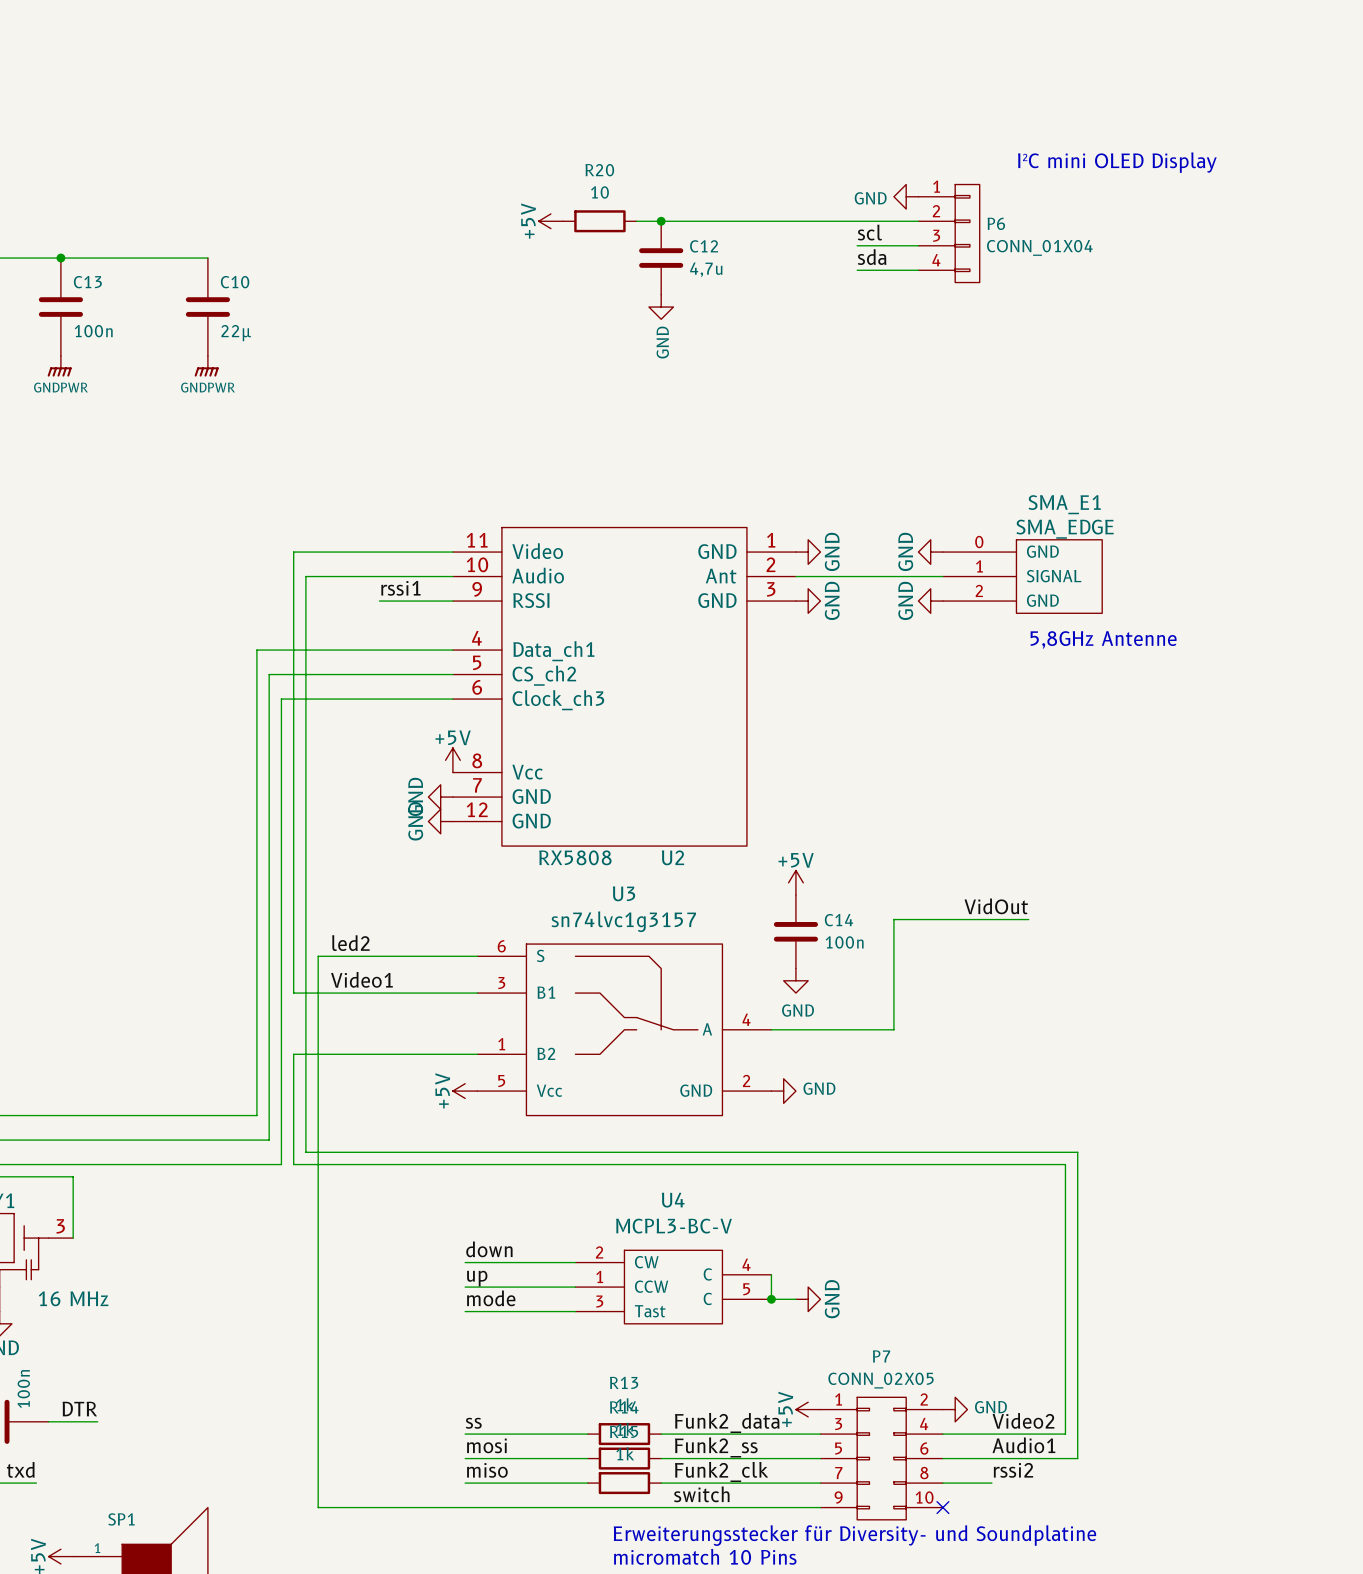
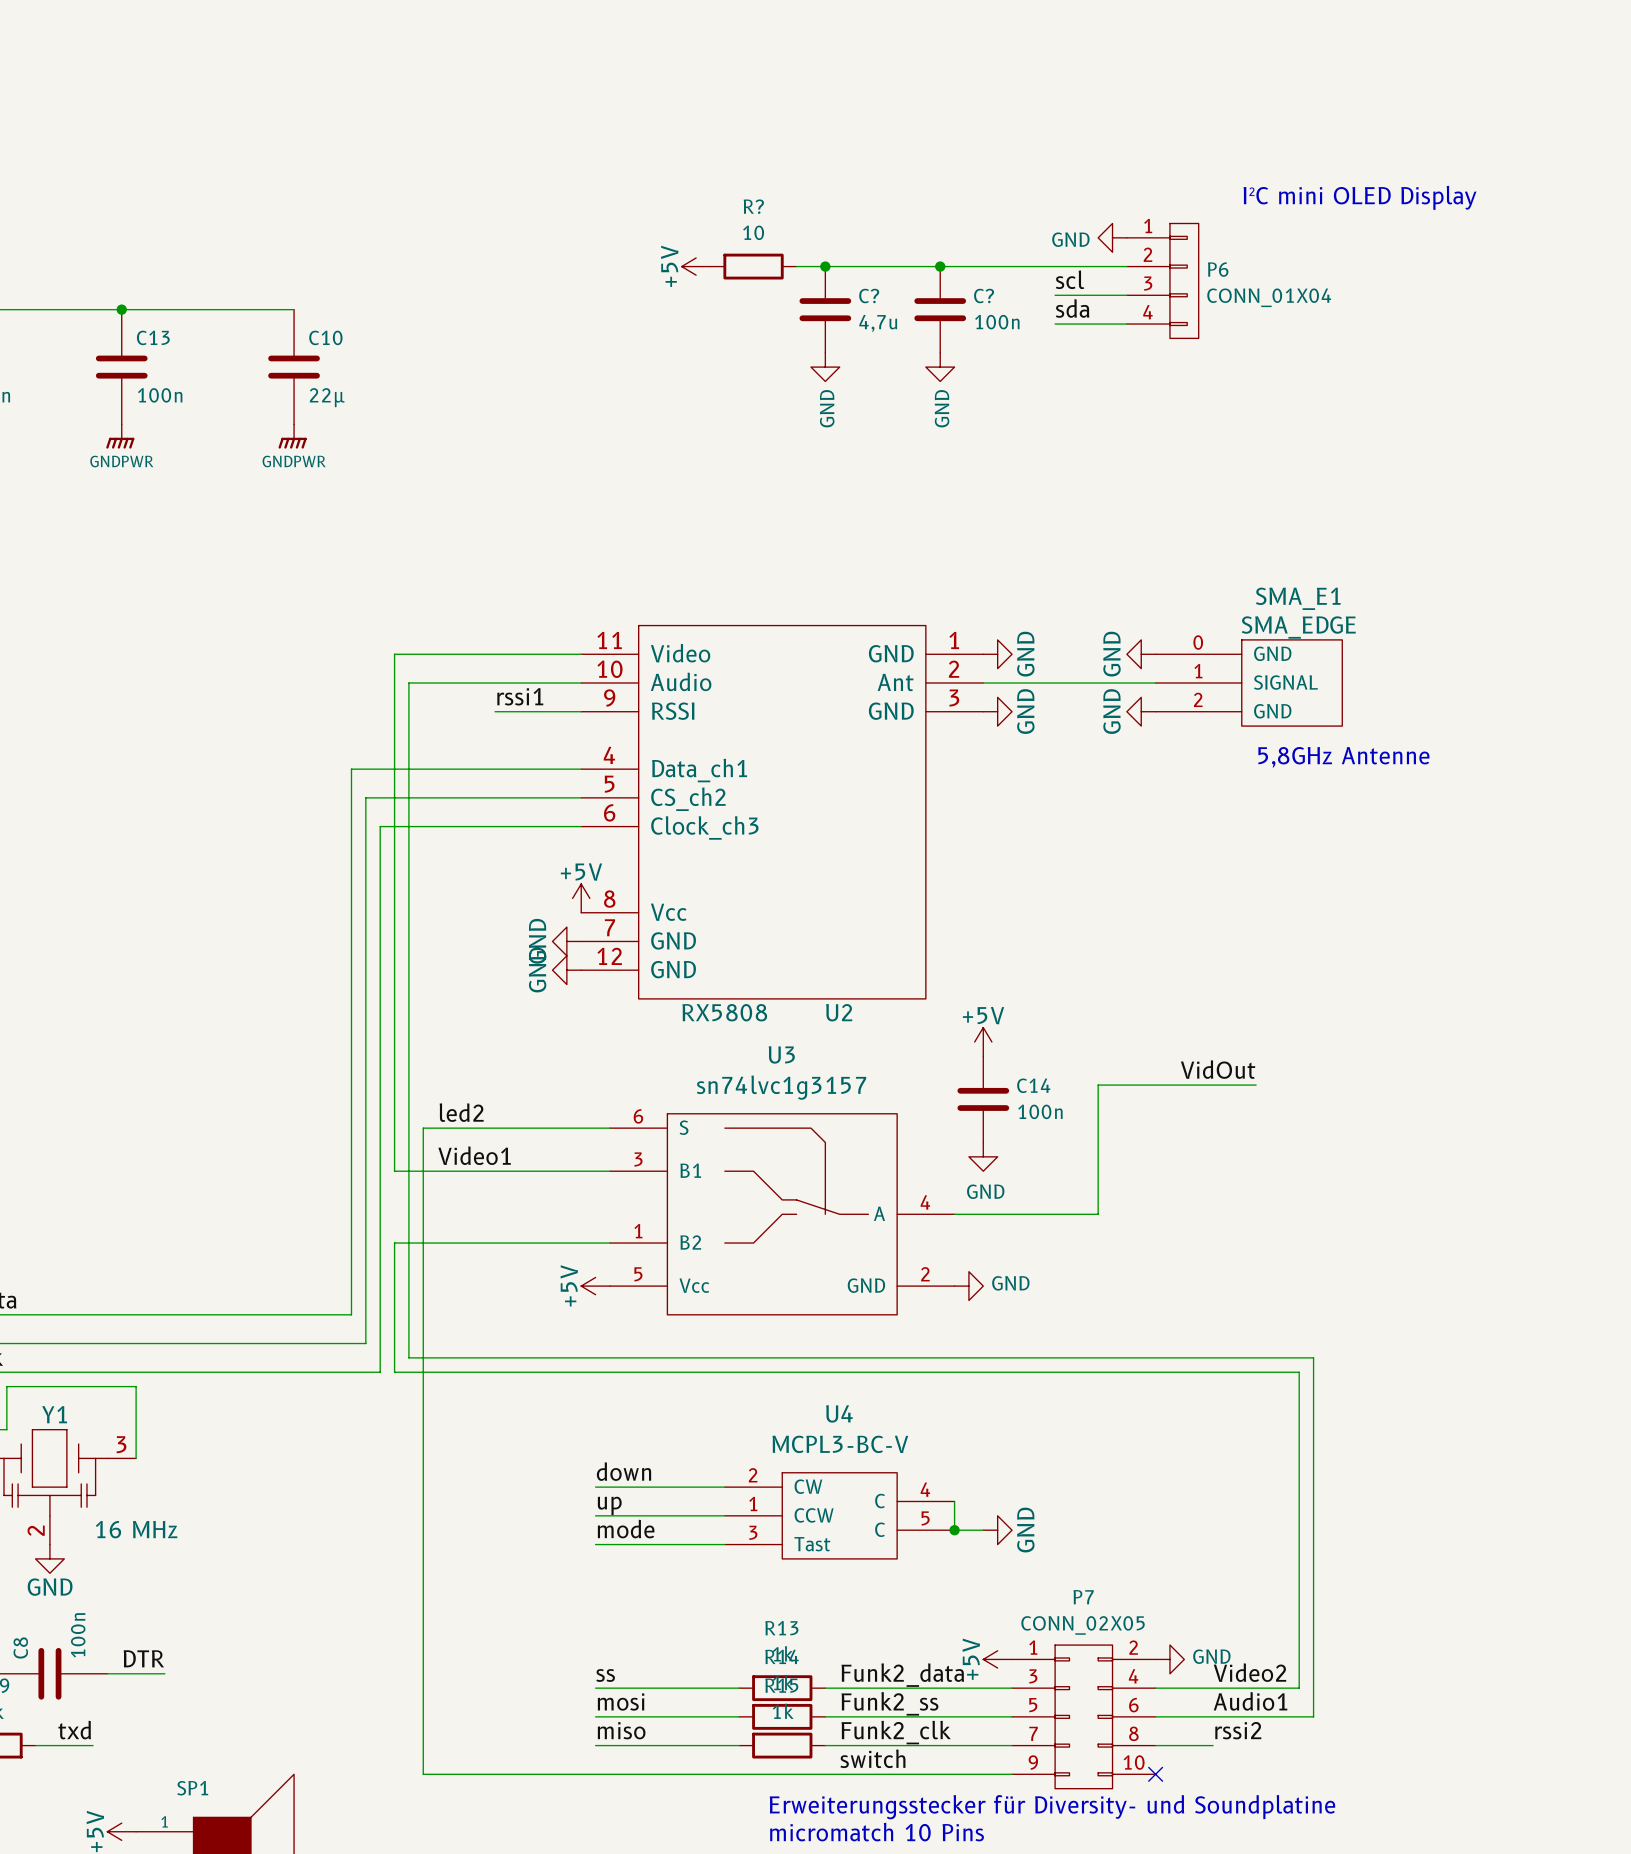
R20 name: R20 (599, 170) -> R? (753, 206)
junction: none -> (940, 266)
C12 name: C12 (704, 246) -> C? (869, 296)
C?: none -> 100n (940, 309)
power symbol: none -> GND (940, 367)

